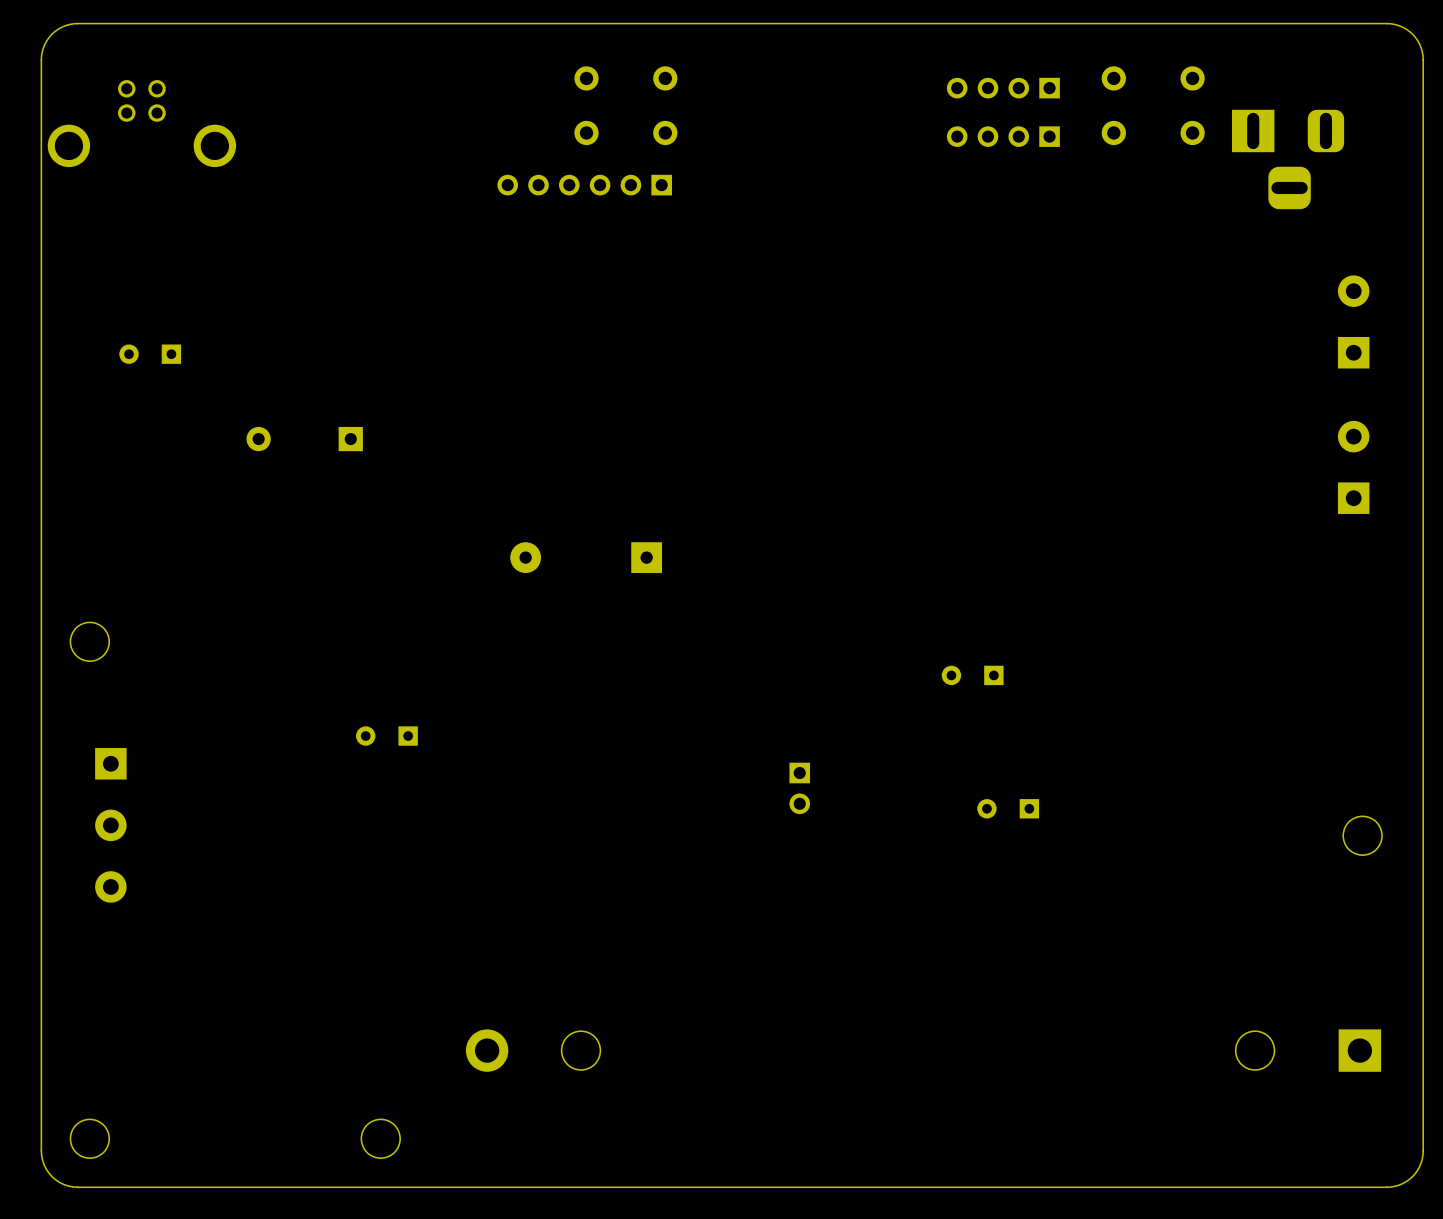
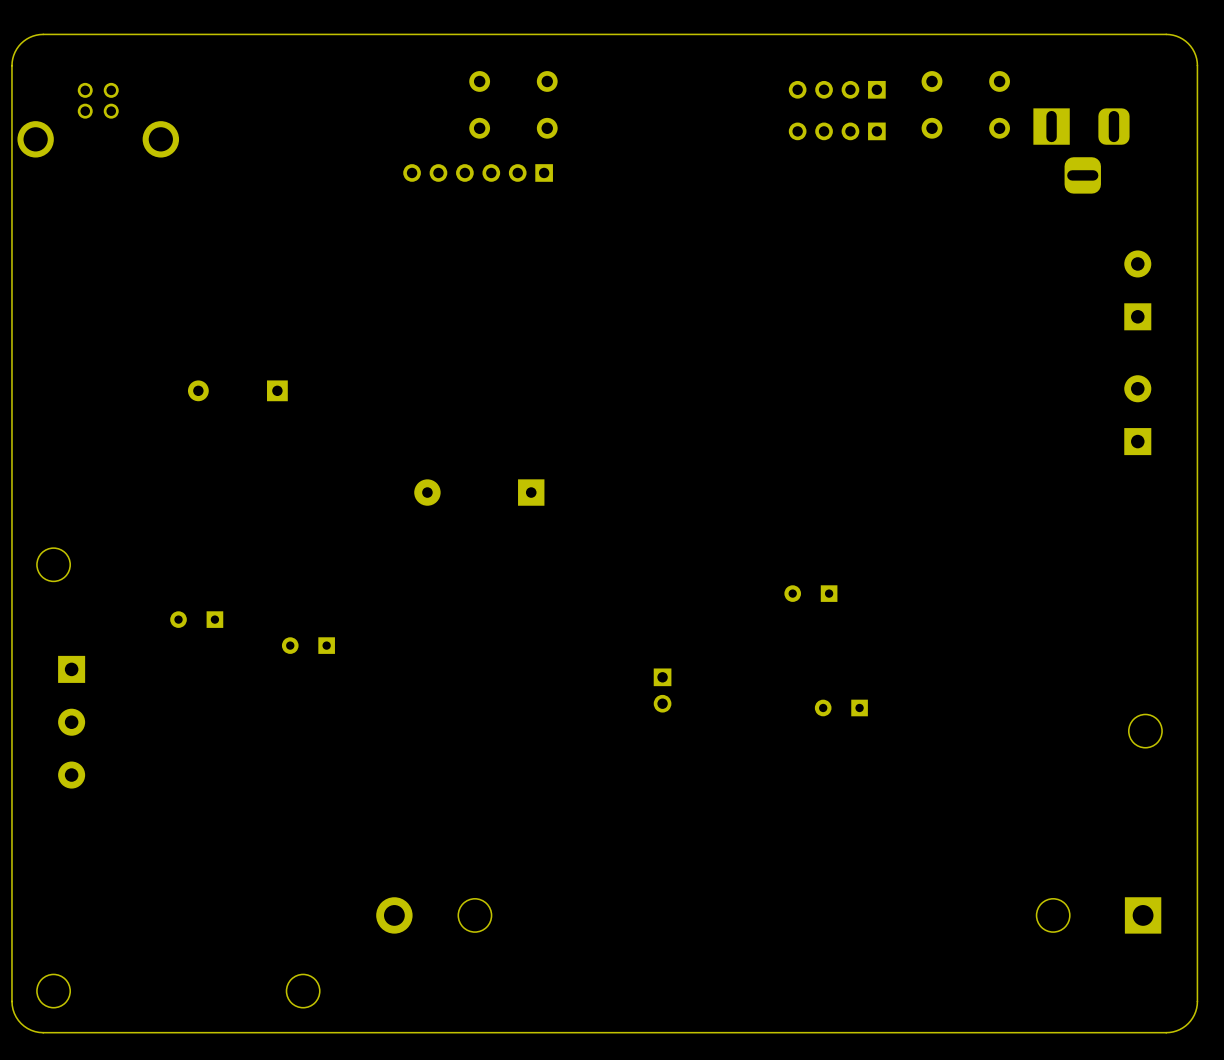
part: (150, 354) -> none
part: none -> (196, 619)

